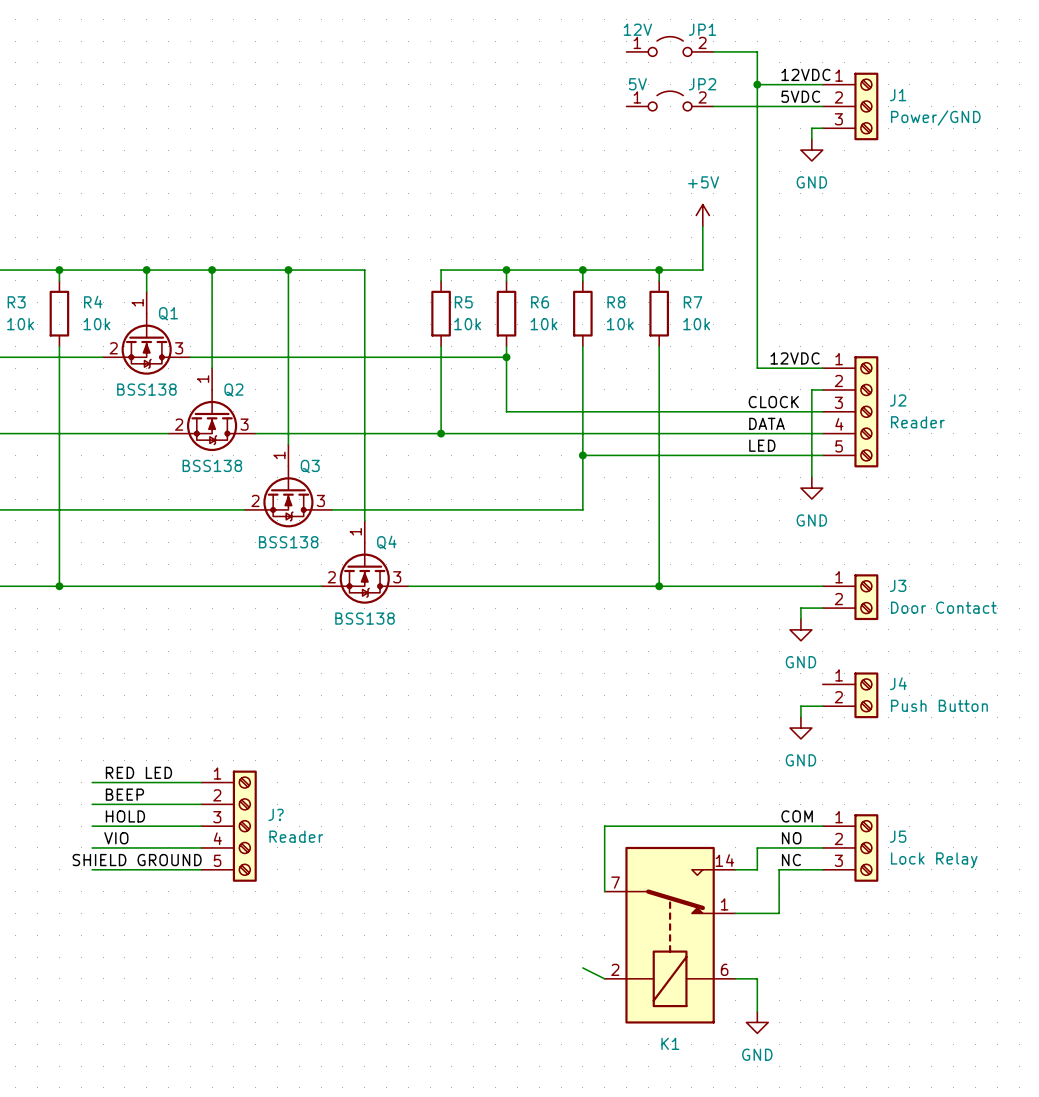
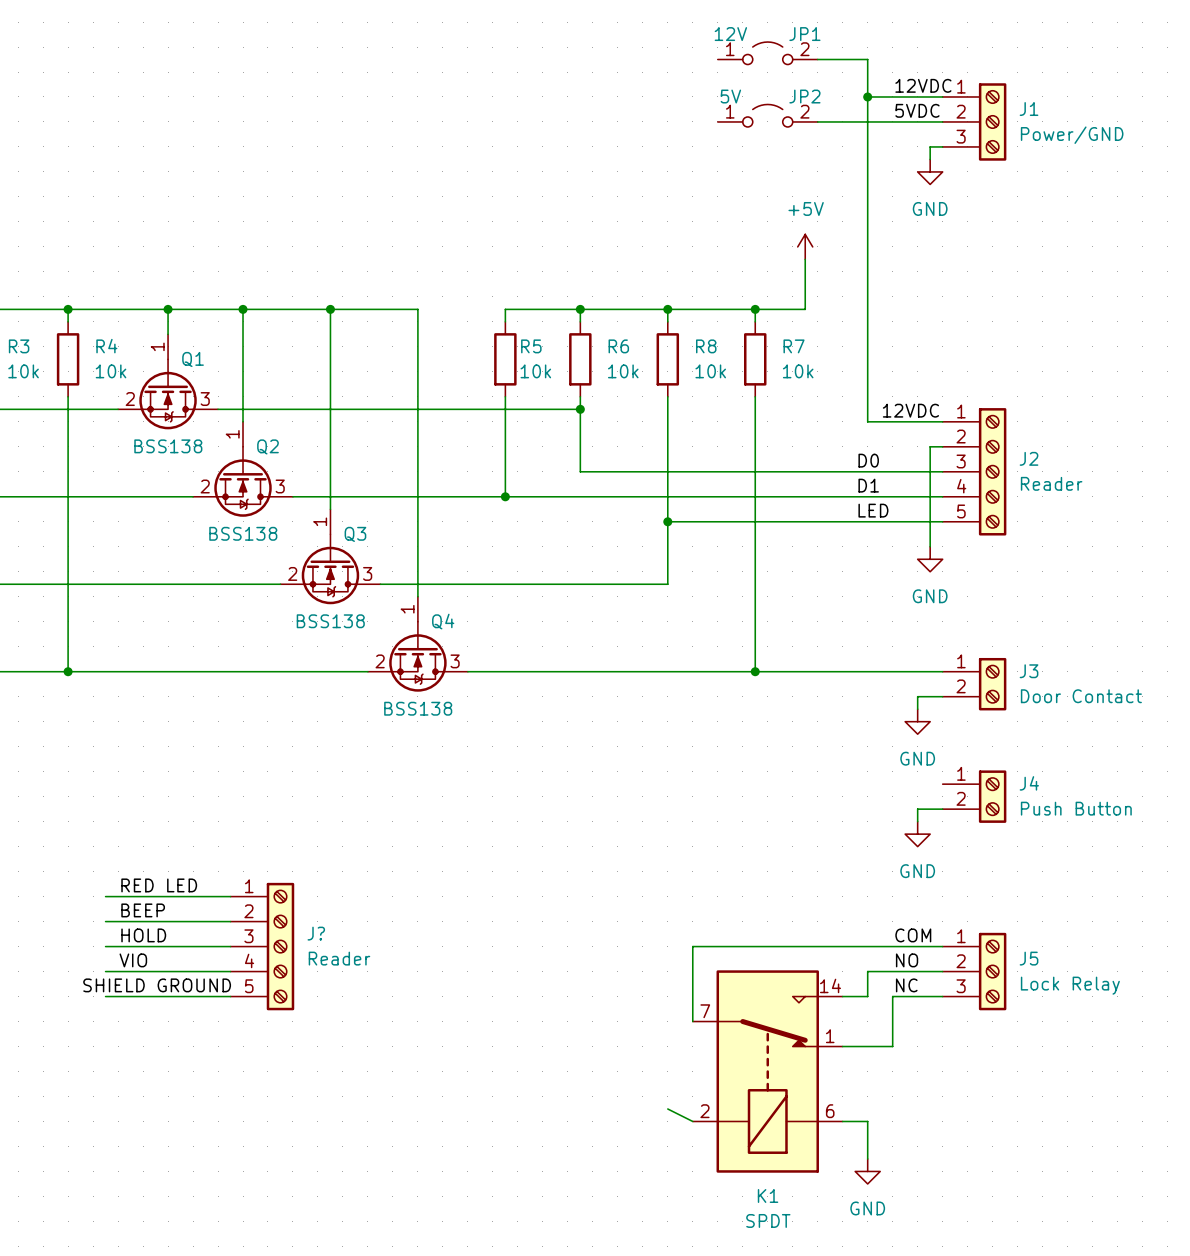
label: CLOCK (773, 402) -> D0 (868, 460)
label: DATA (767, 423) -> D1 (868, 485)
K1 value: none -> SPDT (768, 1220)

